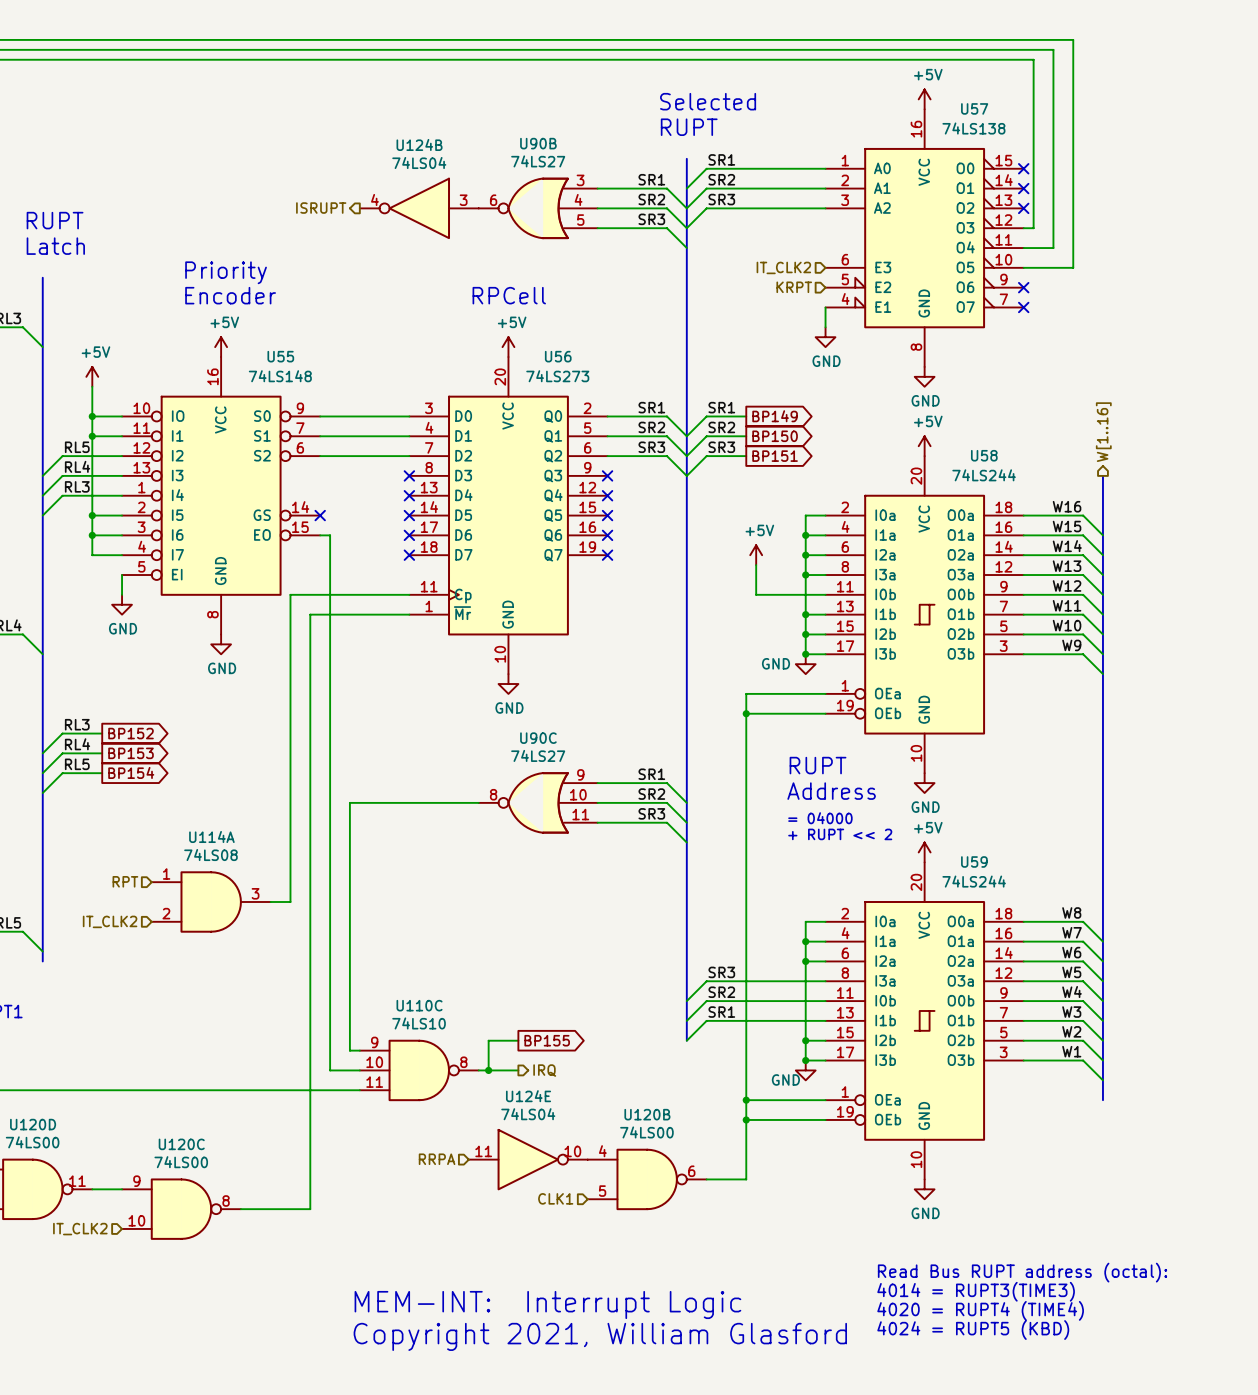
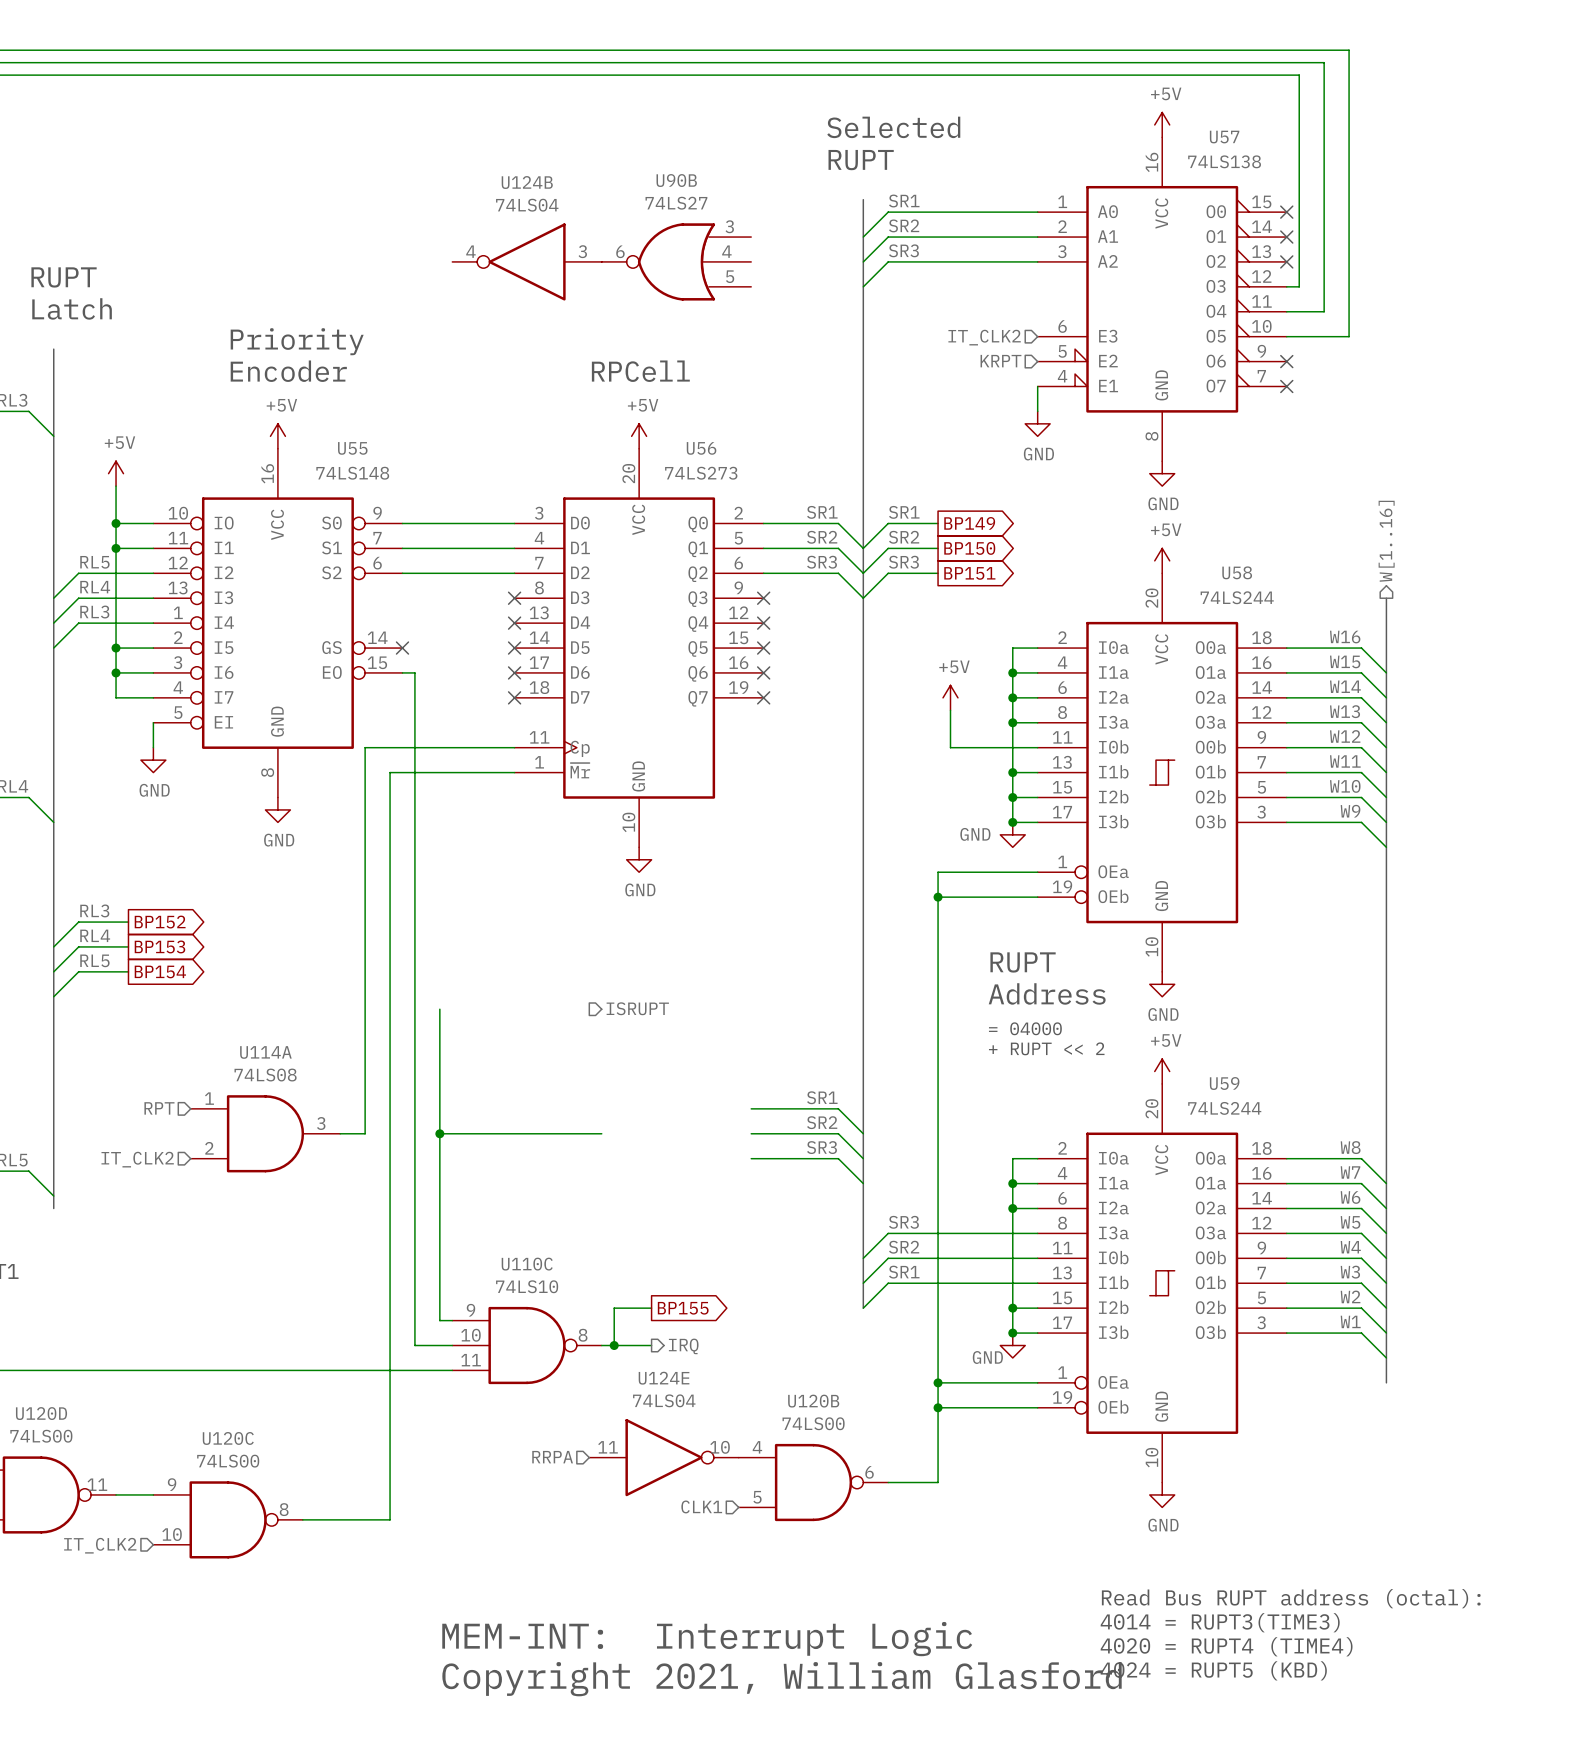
label: SR1 (651, 179) -> none
wire: (597, 188) (667, 188) (686, 208) -> none
label: SR2 (651, 199) -> none
hierarchical label: ISRUPT (321, 208) -> none
wire: (597, 208) (667, 208) (686, 228) -> none
label: SR3 (651, 219) -> none
wire: (597, 228) (667, 228) (686, 248) -> none
label position: SR1 (651, 774) -> SR1 (822, 1097)
wire: (597, 783) (667, 783) (686, 802) -> (751, 1108) (838, 1108) (863, 1133)
label position: SR2 (651, 794) -> SR2 (822, 1122)
wire: (349, 802) (478, 802) -> (439, 1133) (601, 1133)
hierarchical label: none -> ISRUPT (637, 1008)
U90C: 74LS27 (538, 802) -> none
wire: (597, 802) (667, 802) (686, 822) -> (751, 1133) (838, 1133) (863, 1158)
label position: SR3 (651, 813) -> SR3 (822, 1147)
wire: (597, 822) (667, 822) (686, 842) -> (751, 1158) (838, 1158) (863, 1183)
junction: none -> (439, 1133)

